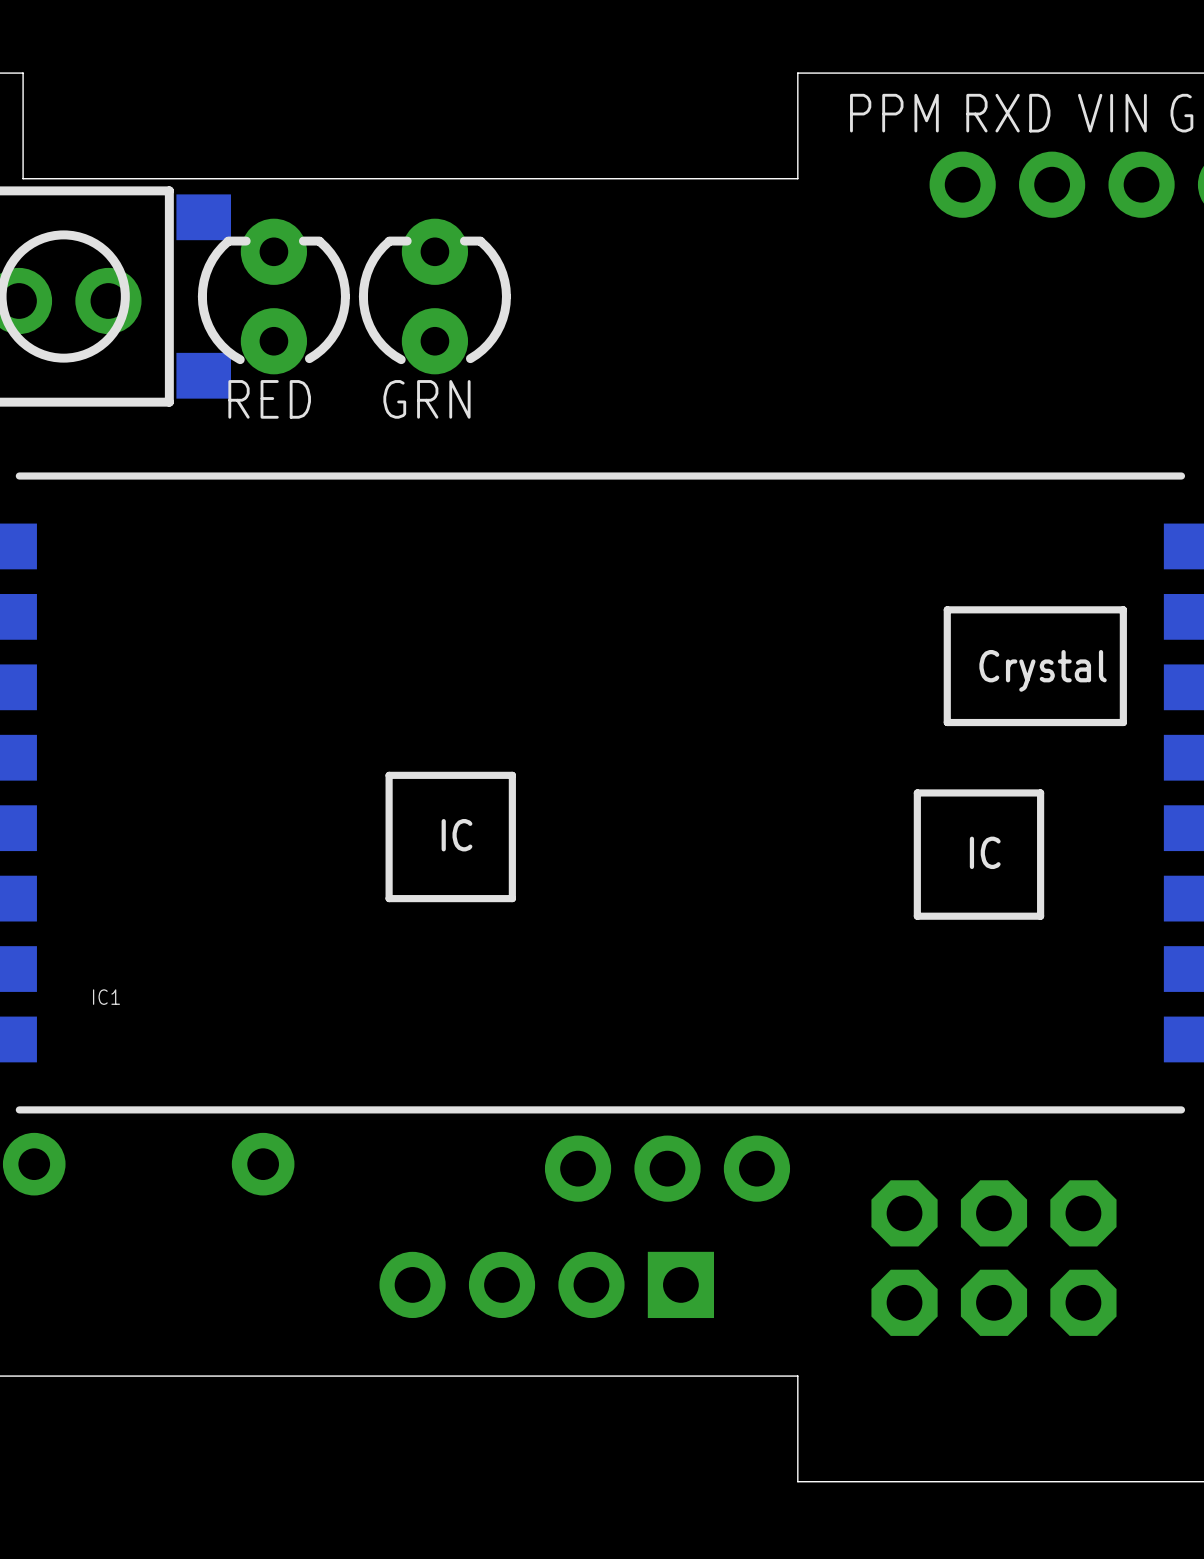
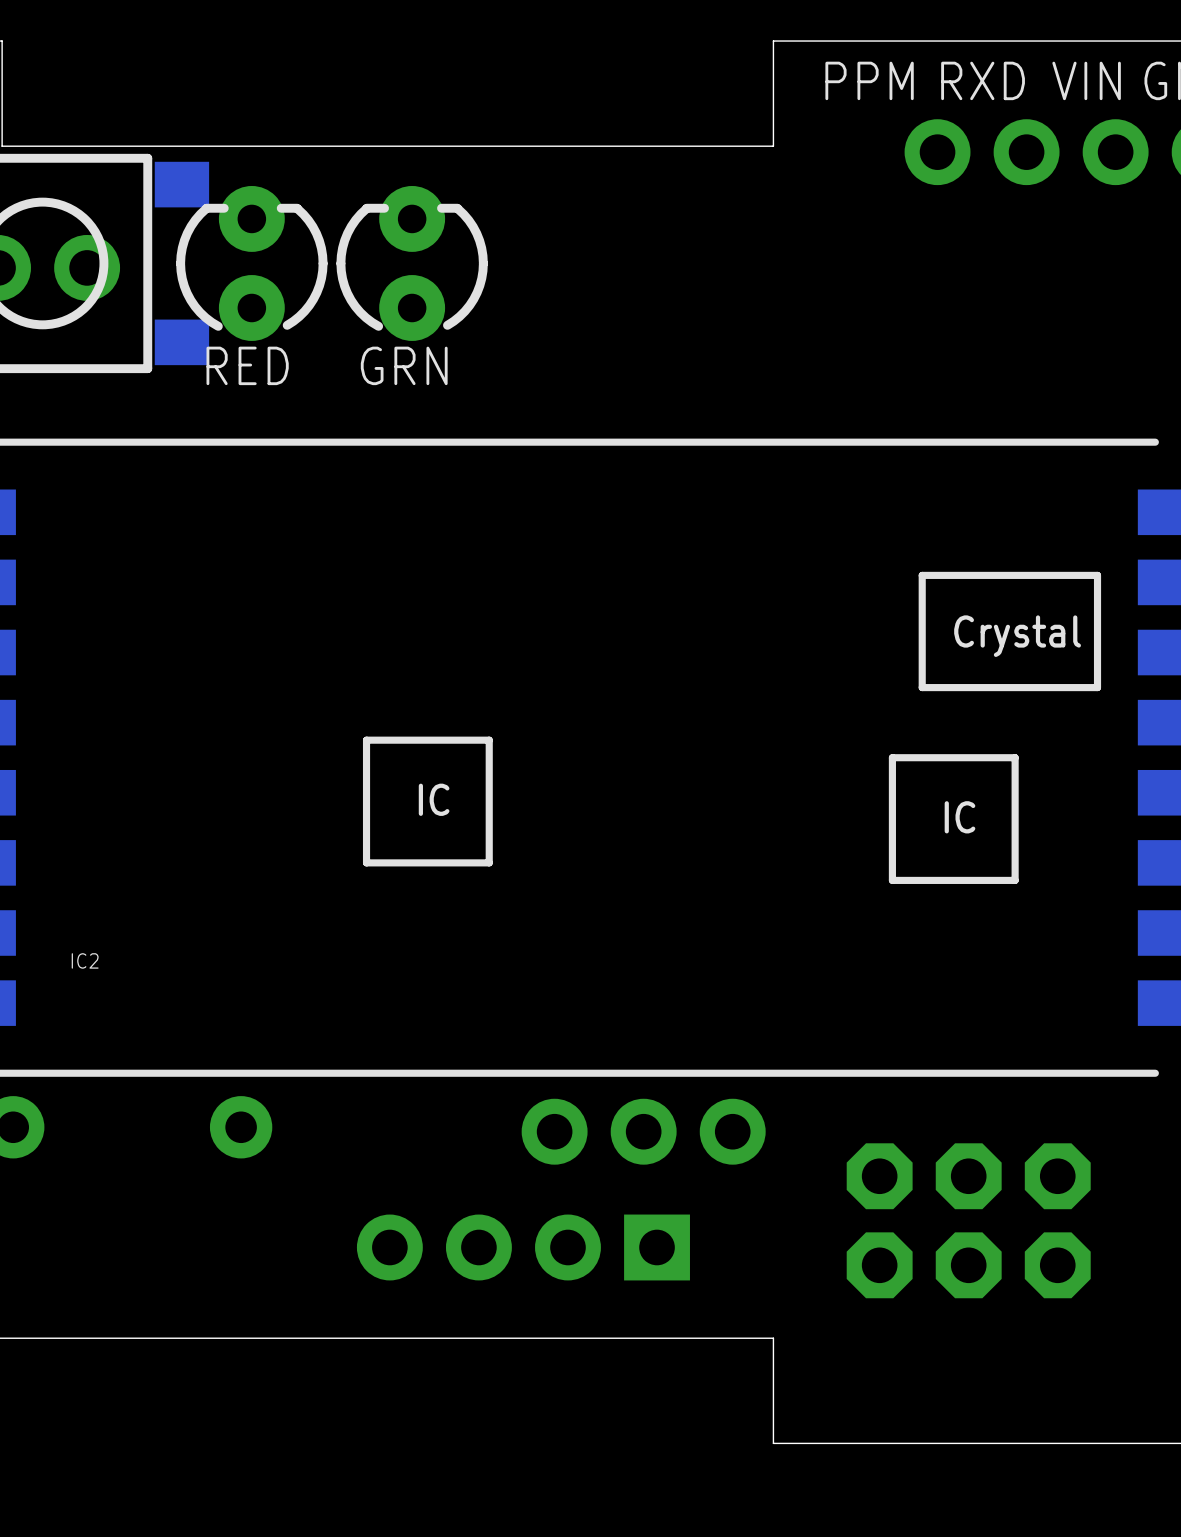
IC1 name: IC1 (106, 997) -> IC2 (85, 960)

